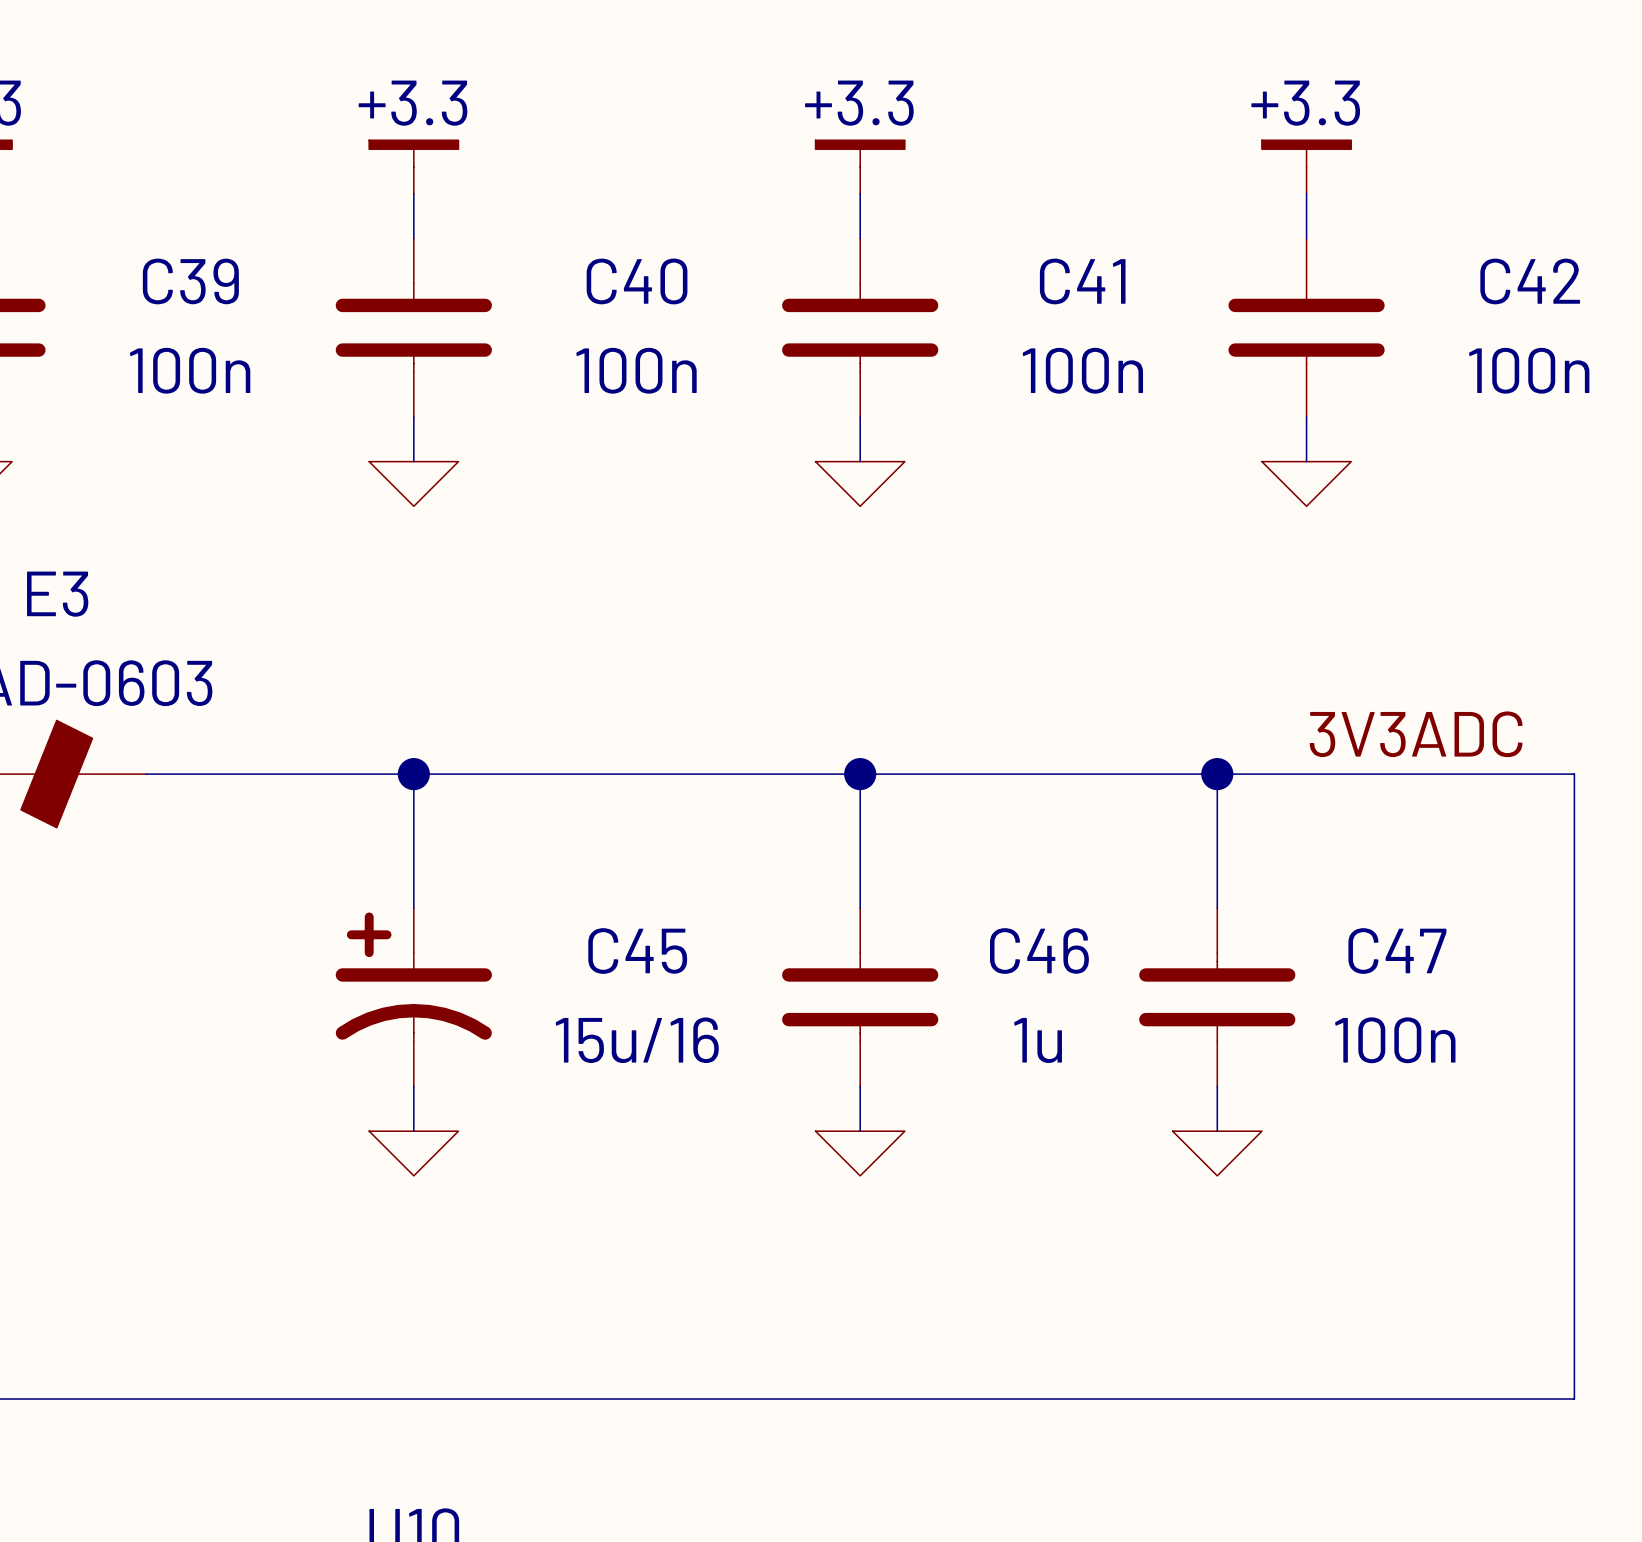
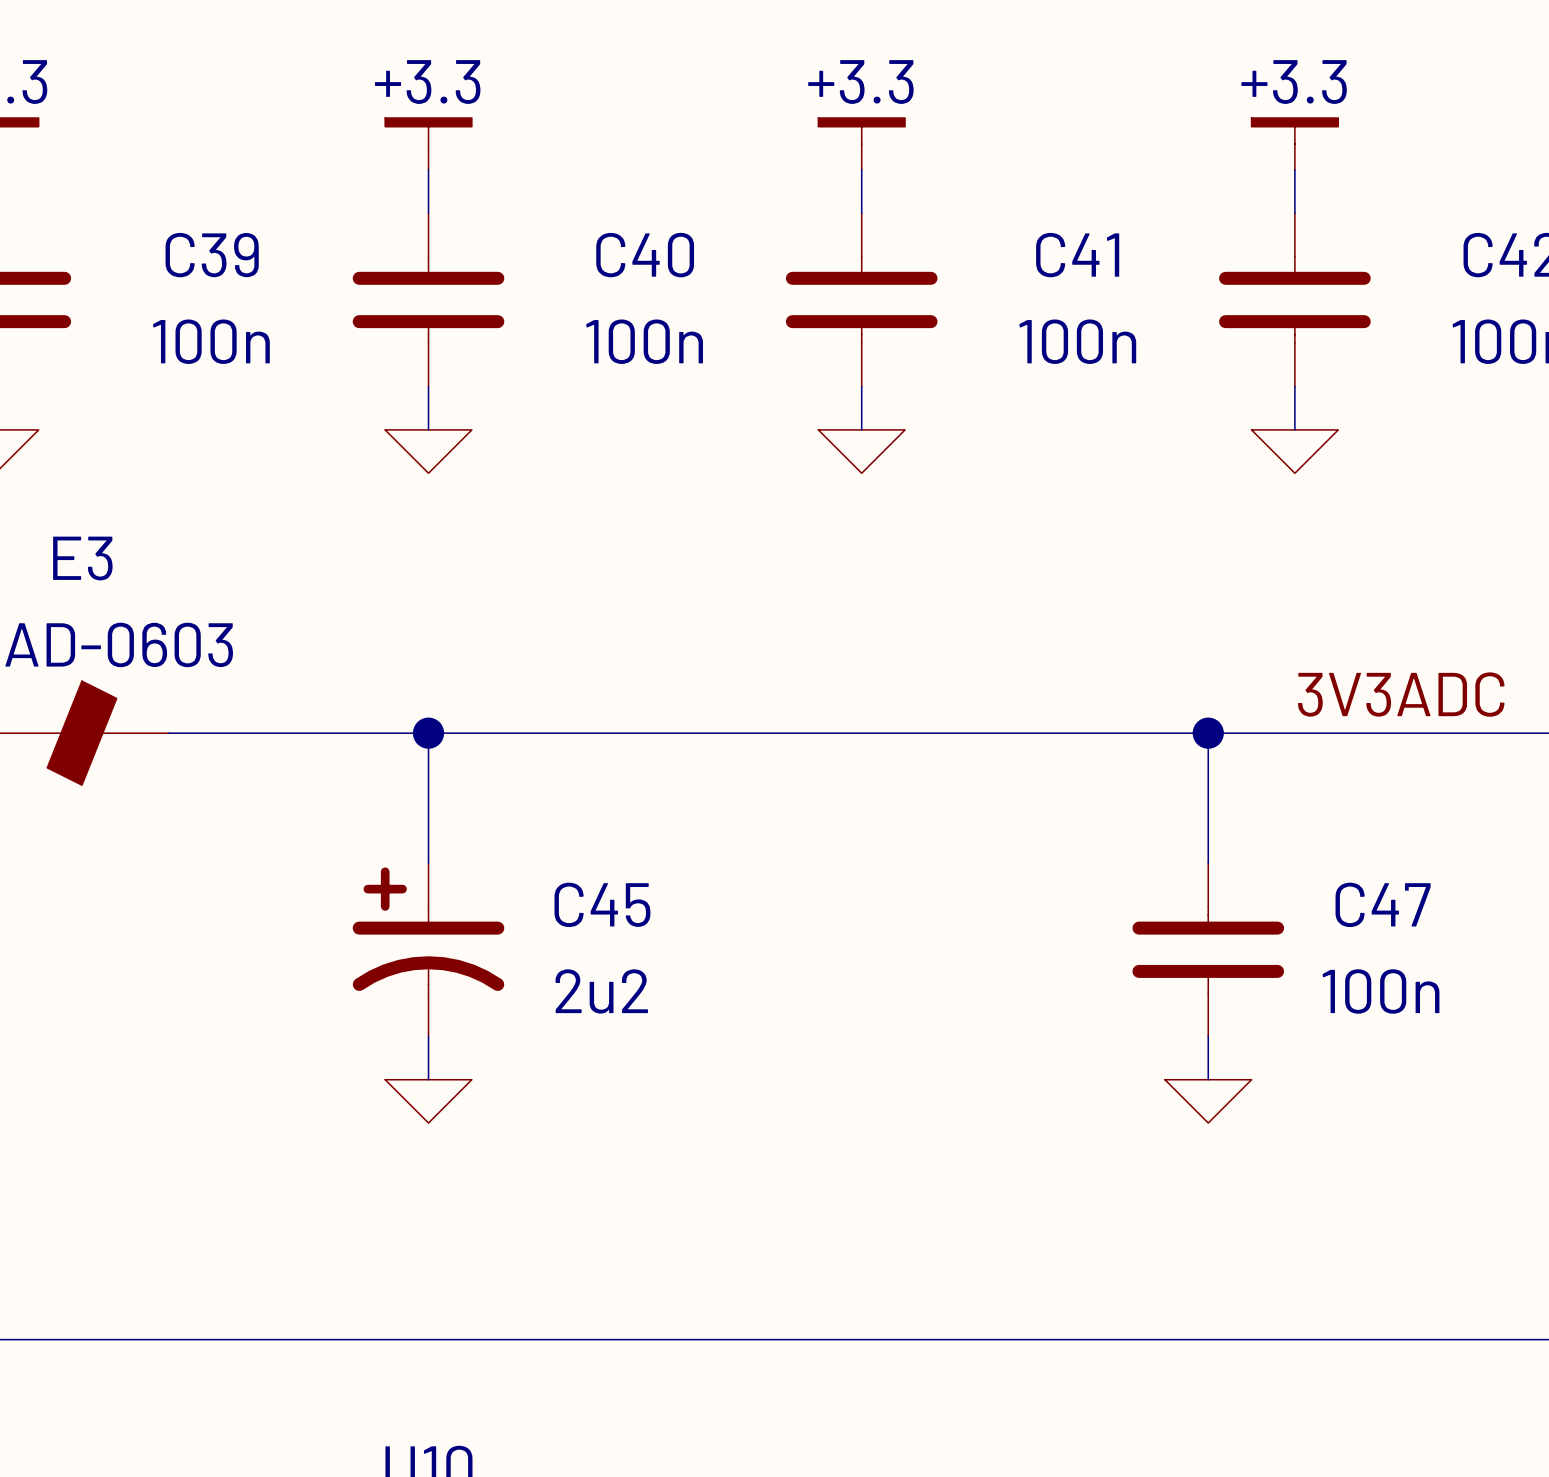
wire: (860, 774) (860, 908) -> none
junction: (860, 774) -> none
C45 name position: C45 (637, 951) -> C45 (602, 904)
C46: 1u (860, 997) -> none
C45 value: 15u/16 (637, 1040) -> 2u2 (601, 991)
wire: (860, 1086) (860, 1131) -> none
power symbol: (860, 1153) -> none

